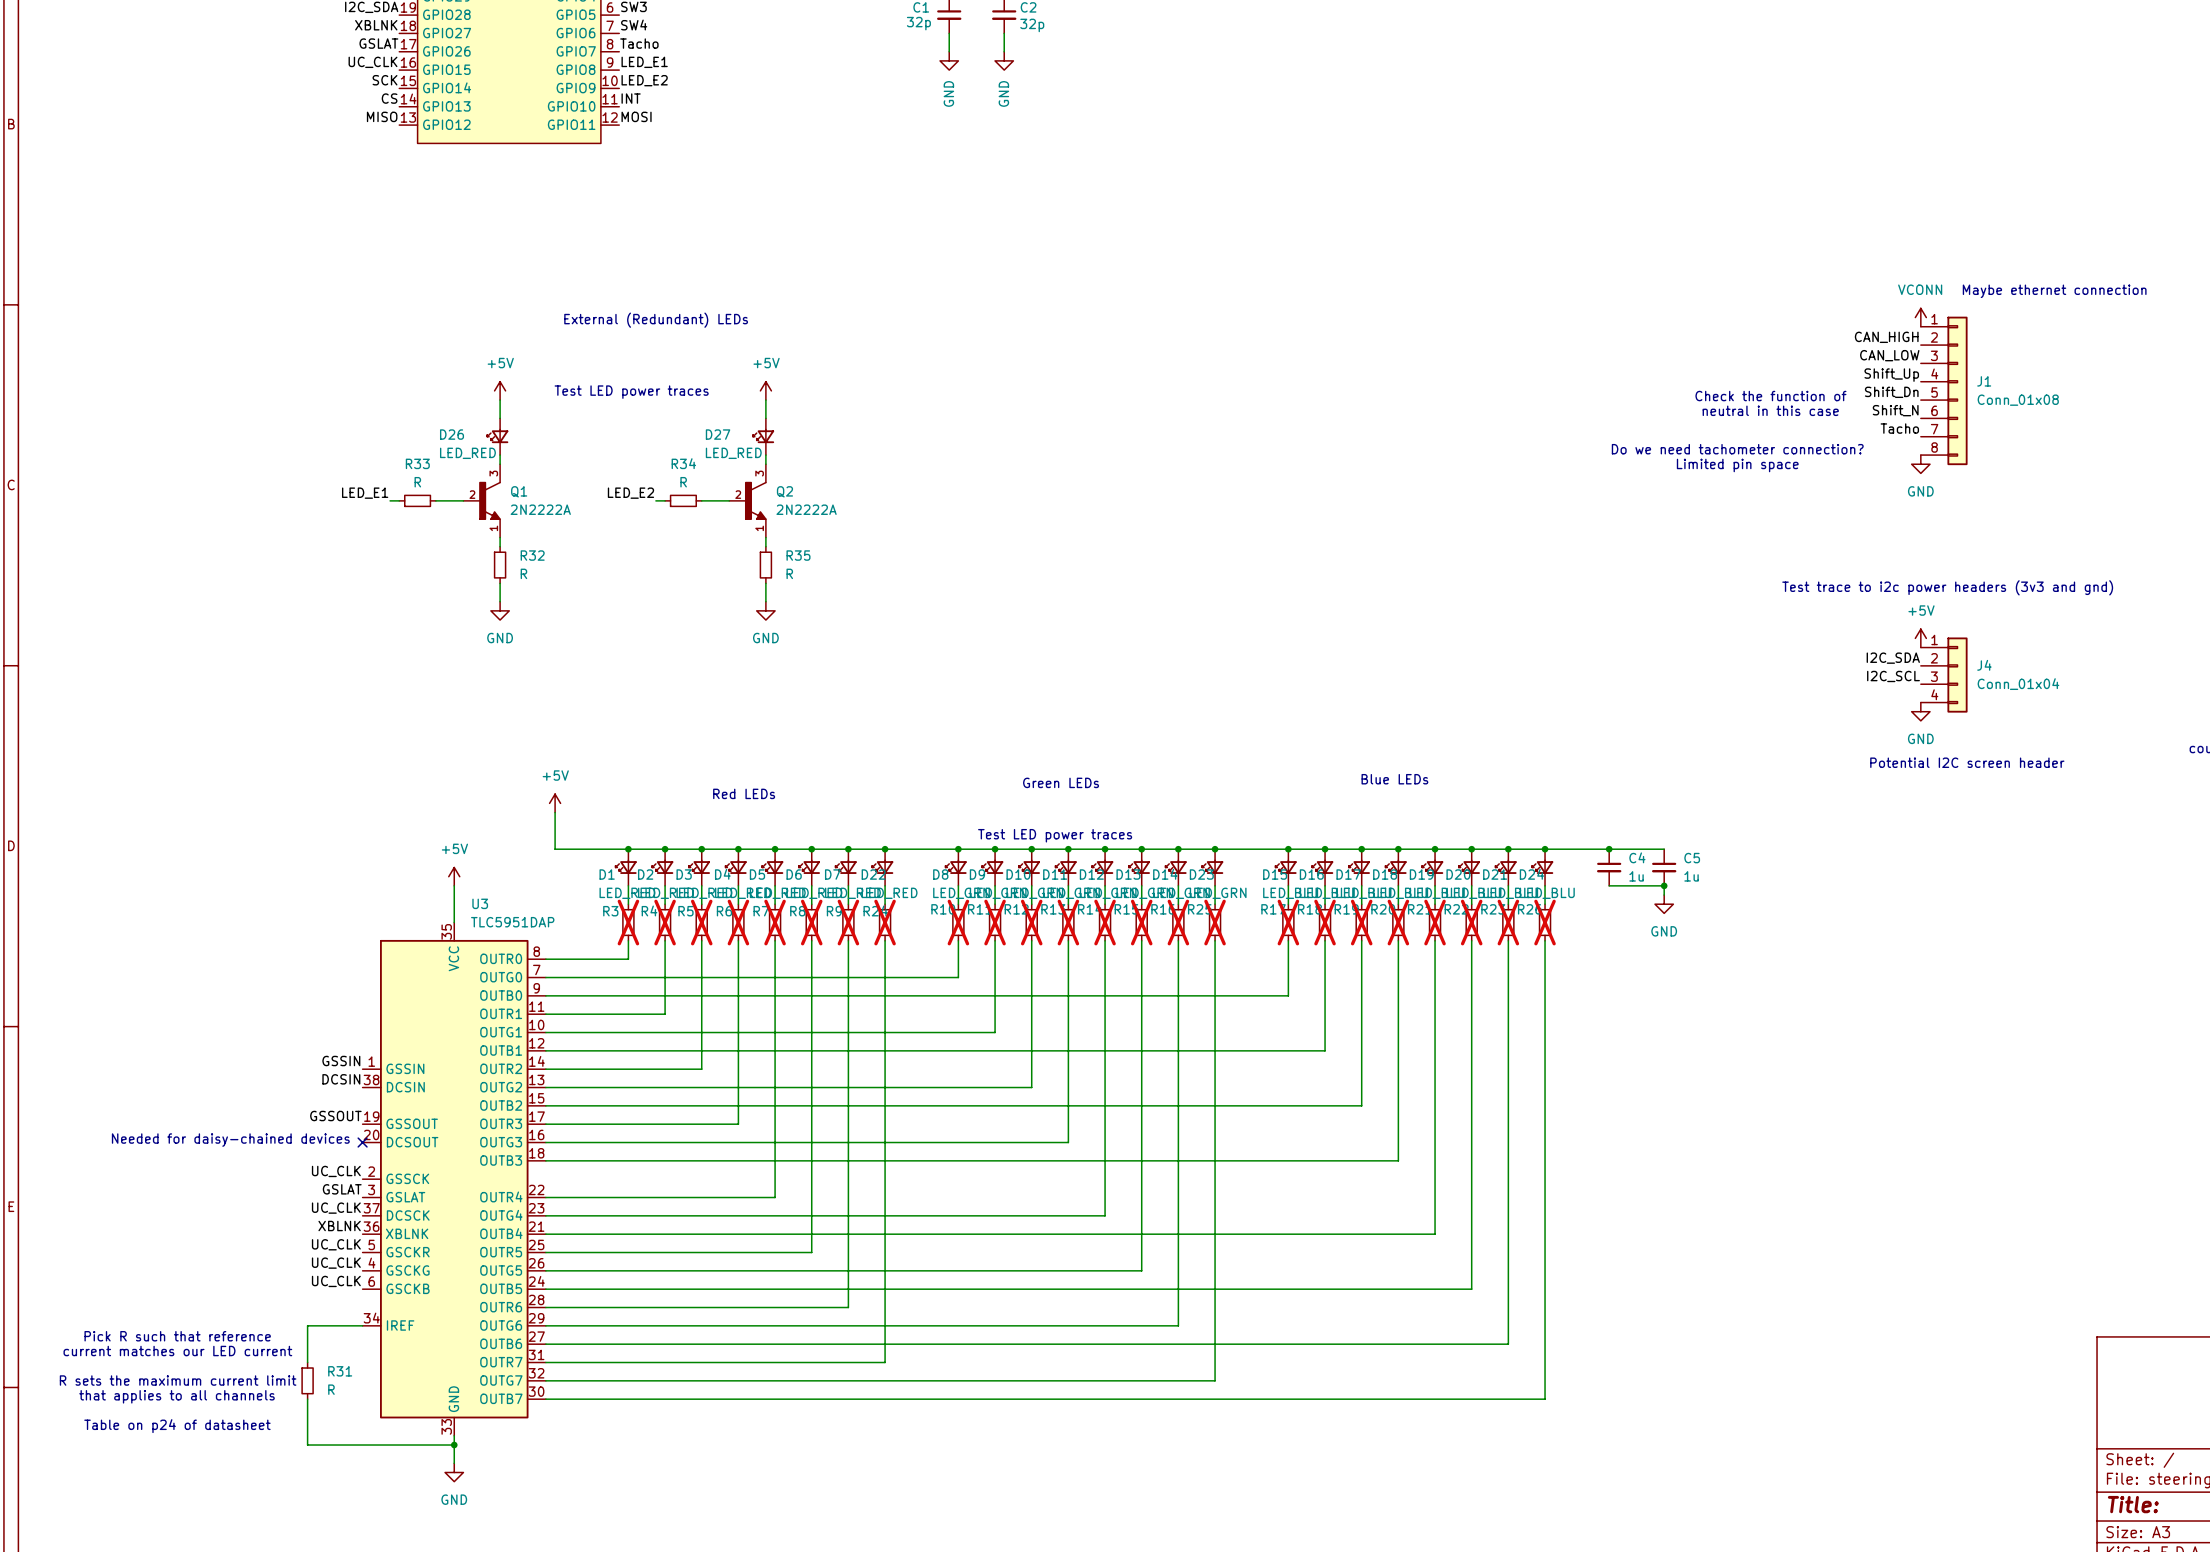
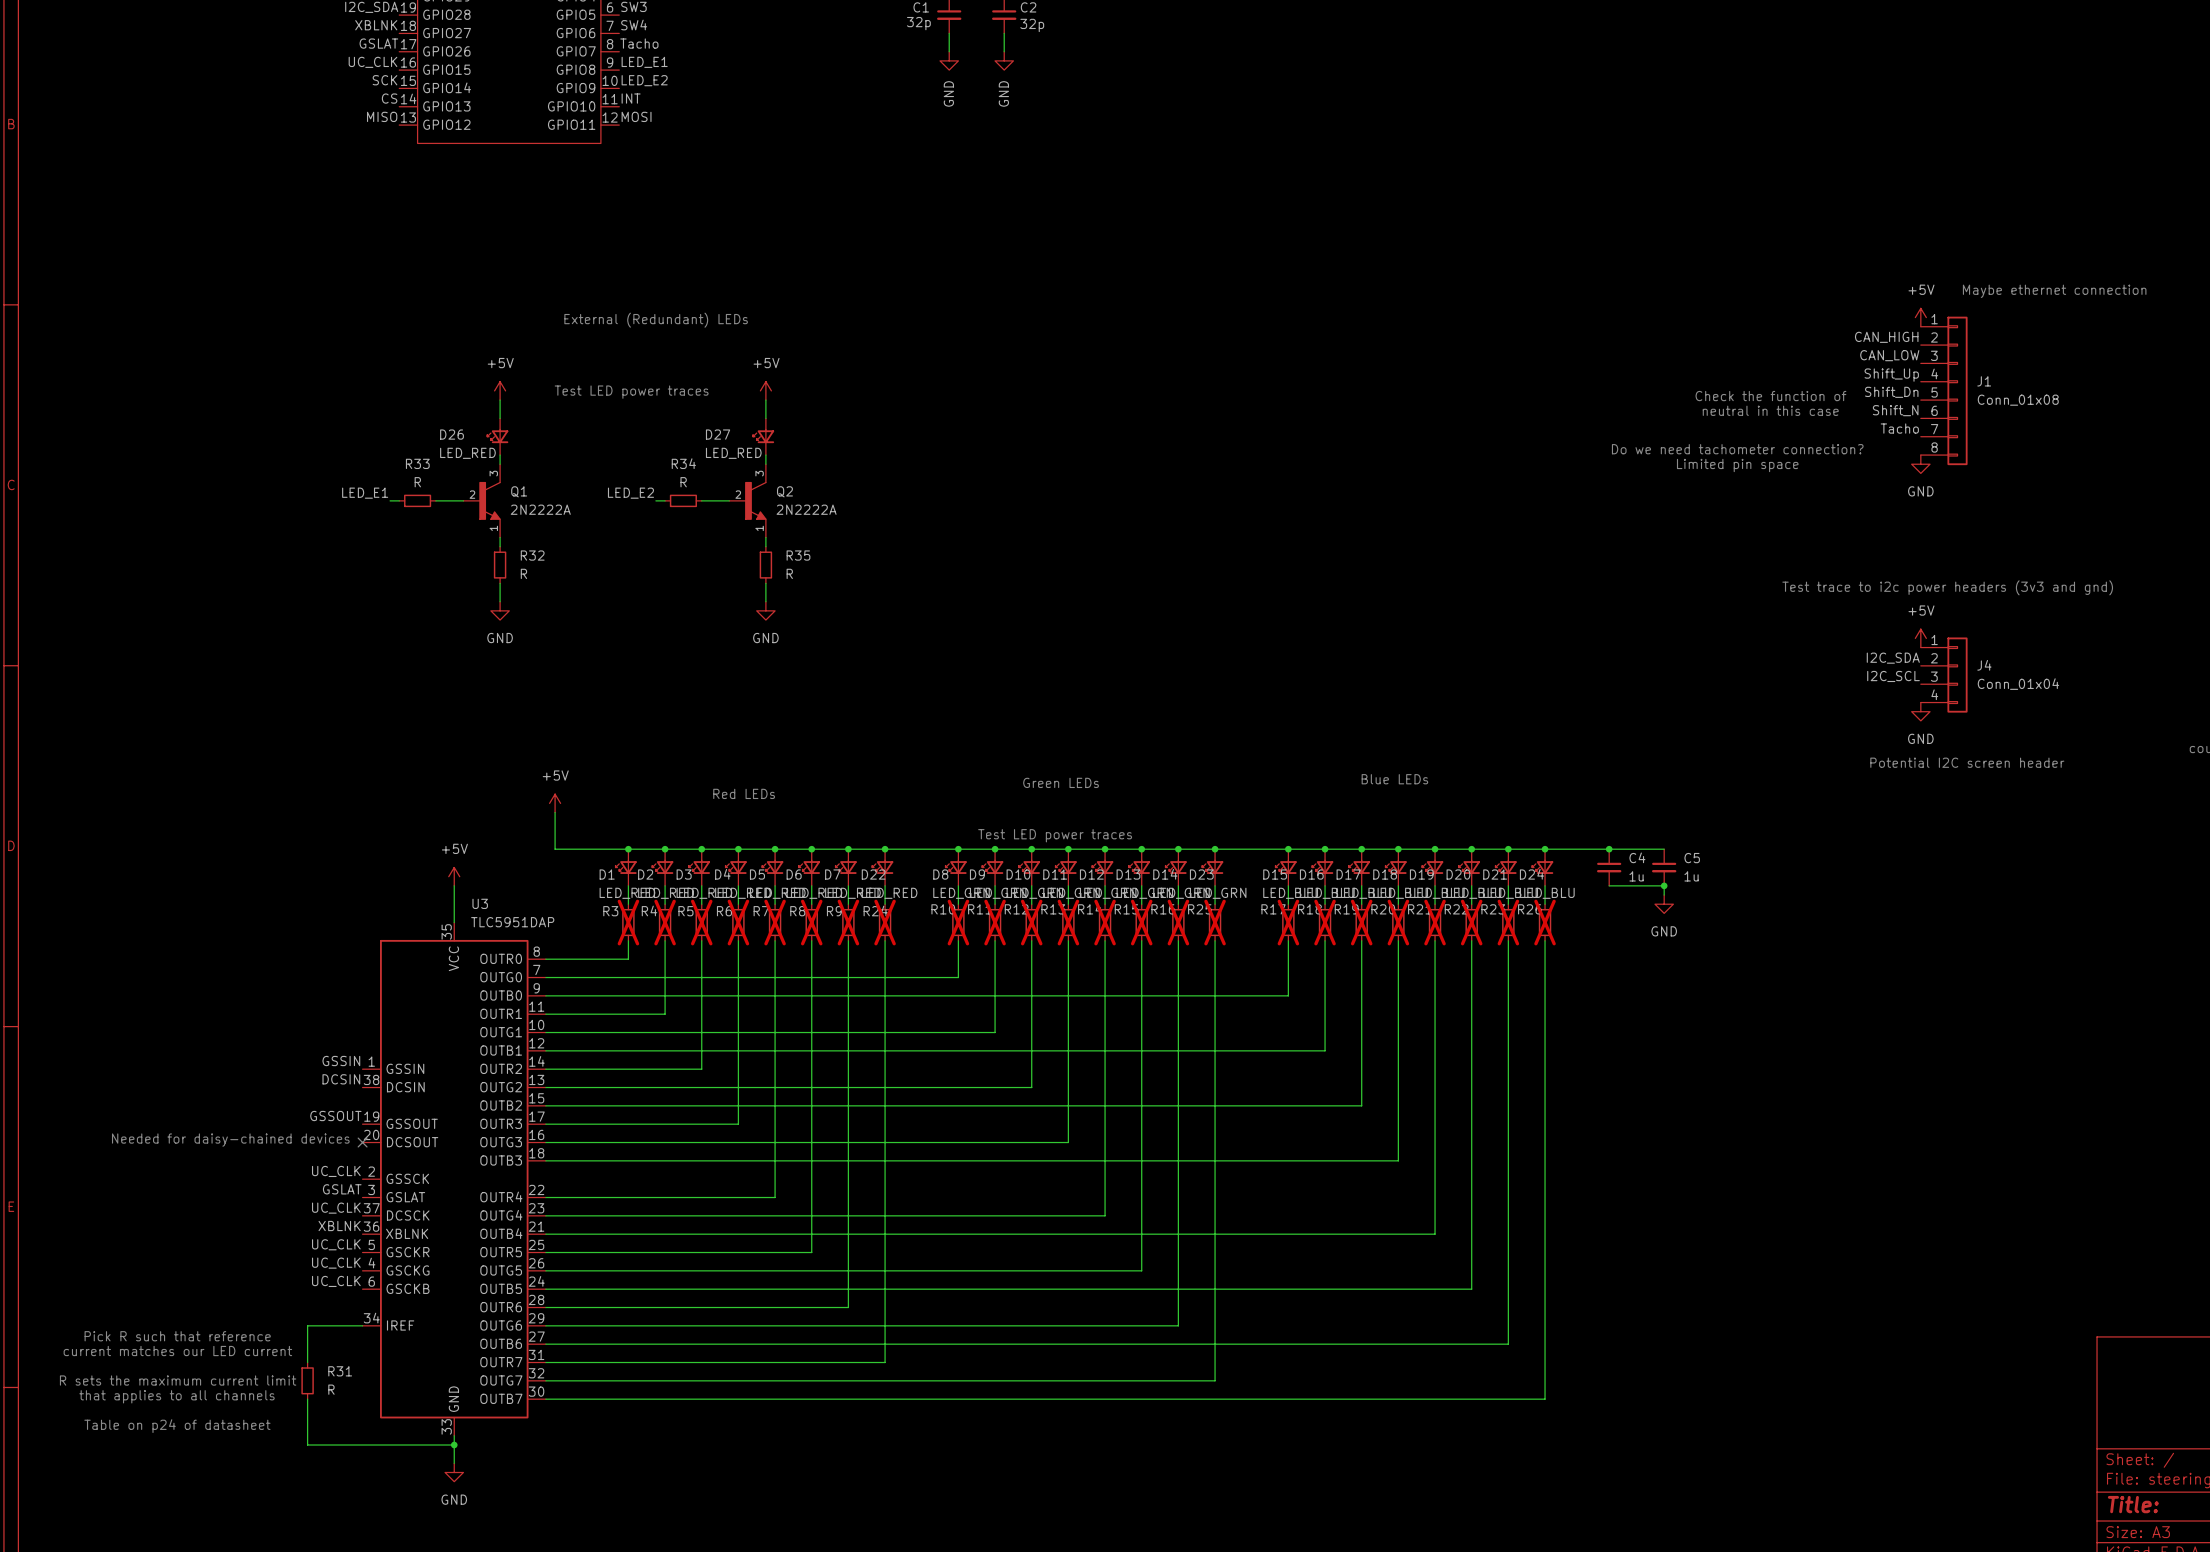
power symbol: VCONN (1920, 317) -> +5V (1920, 317)

